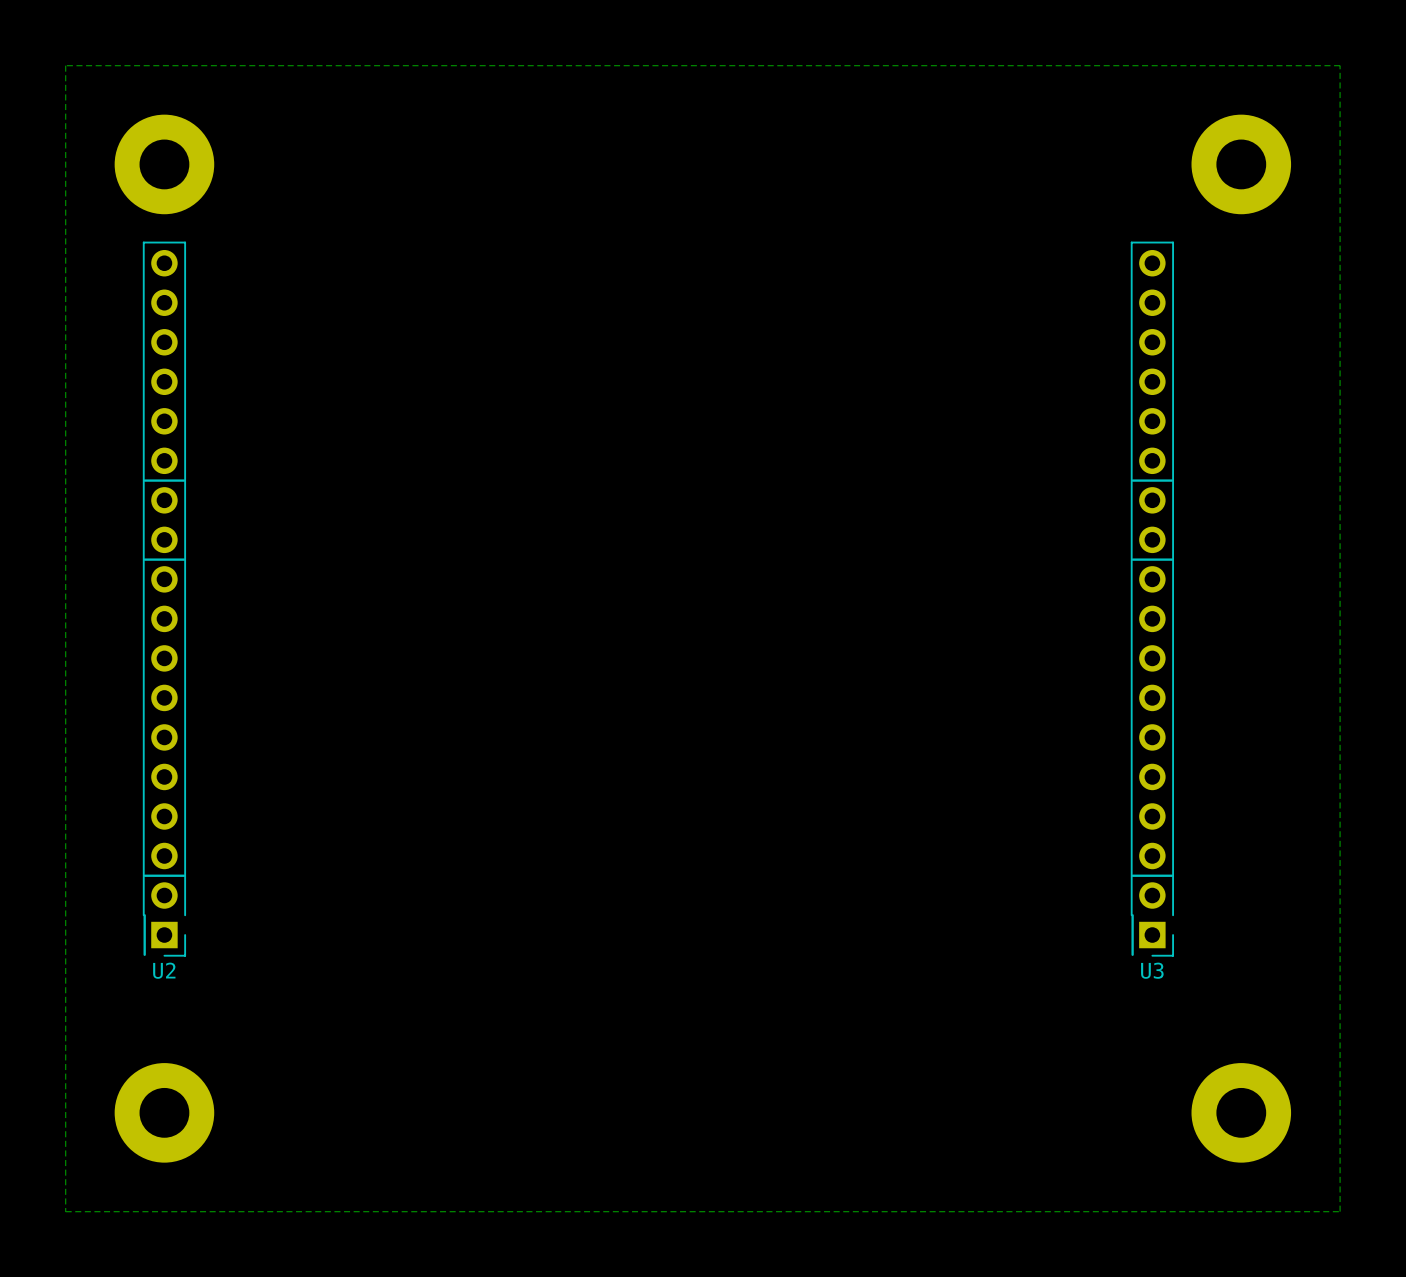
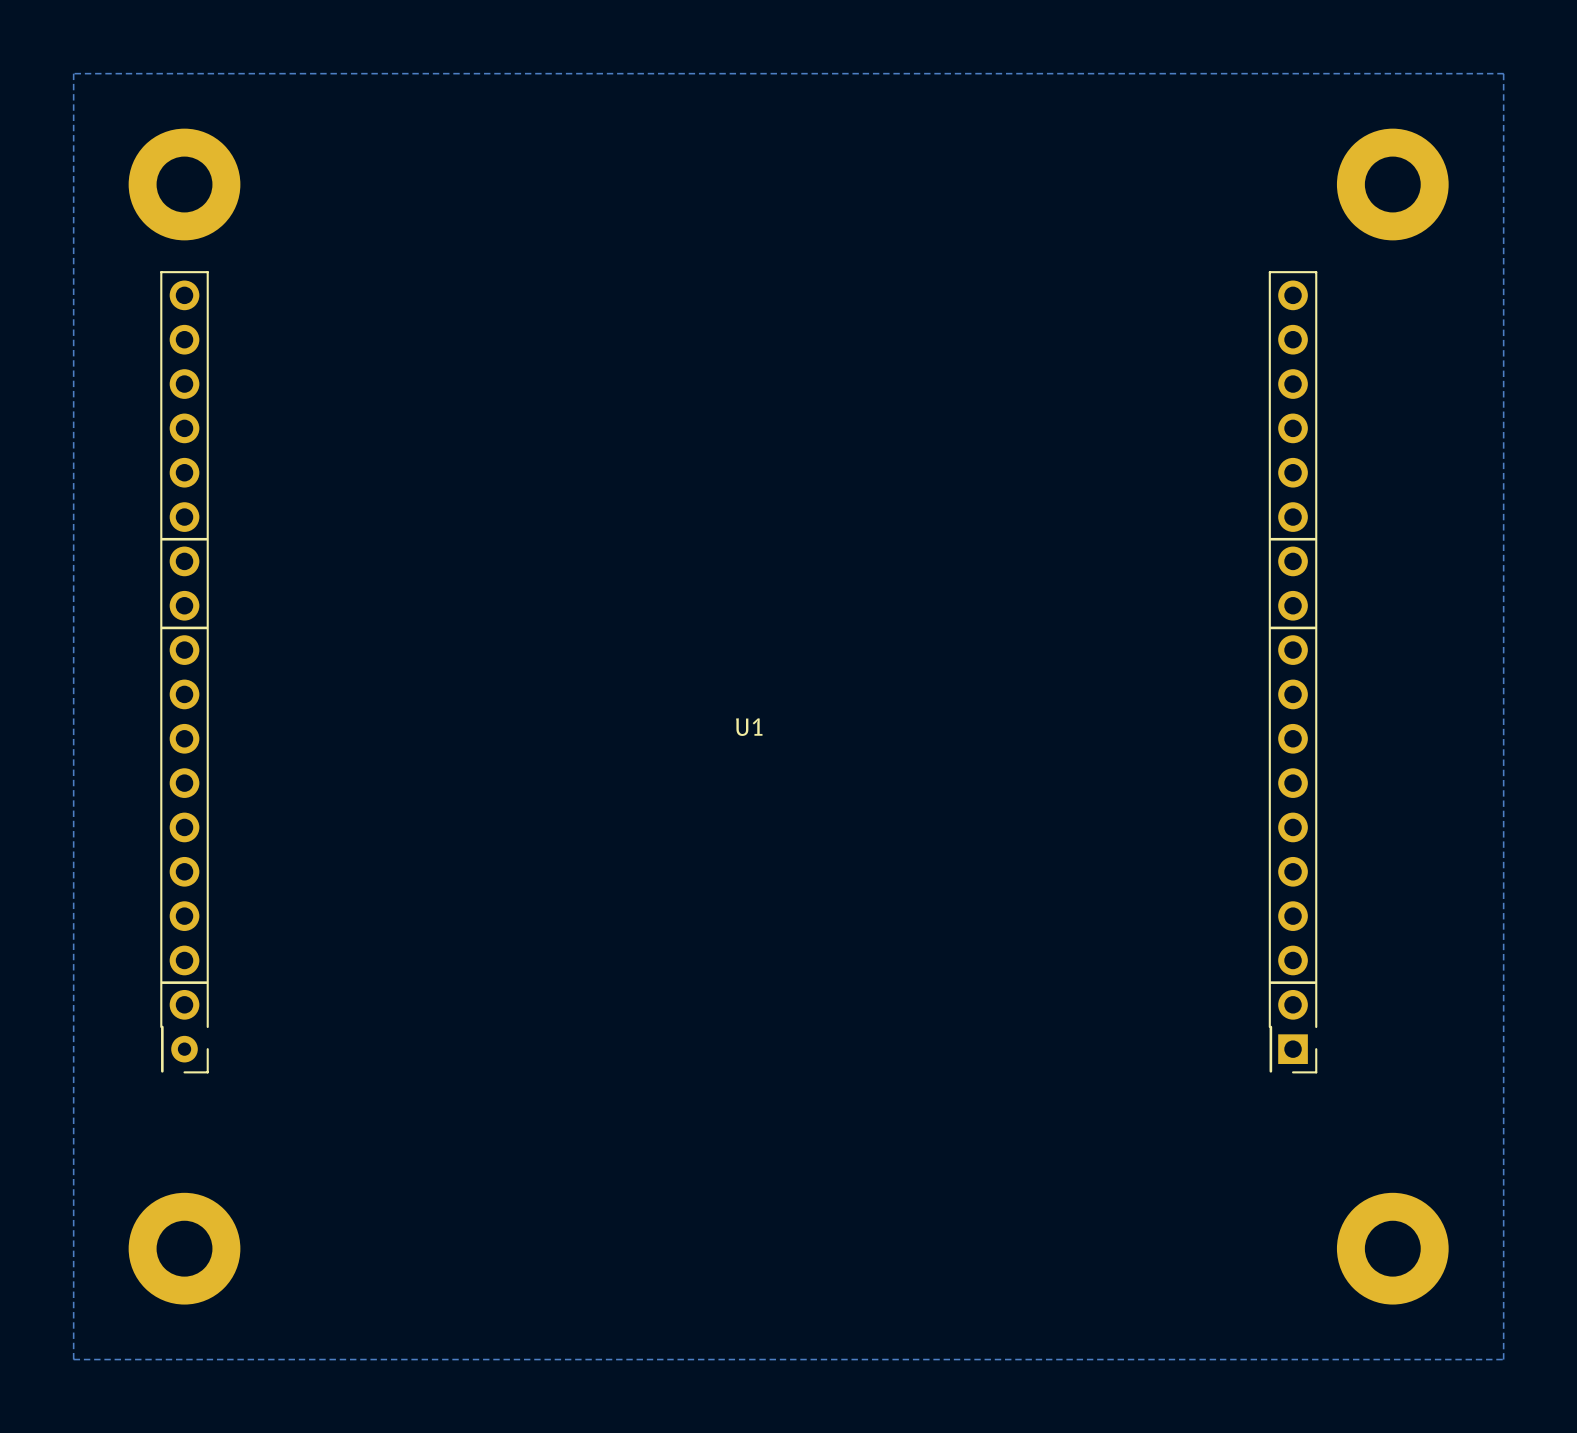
U2: (164, 599) -> none
U1: none -> (738, 672)
U3: (1152, 599) -> none

